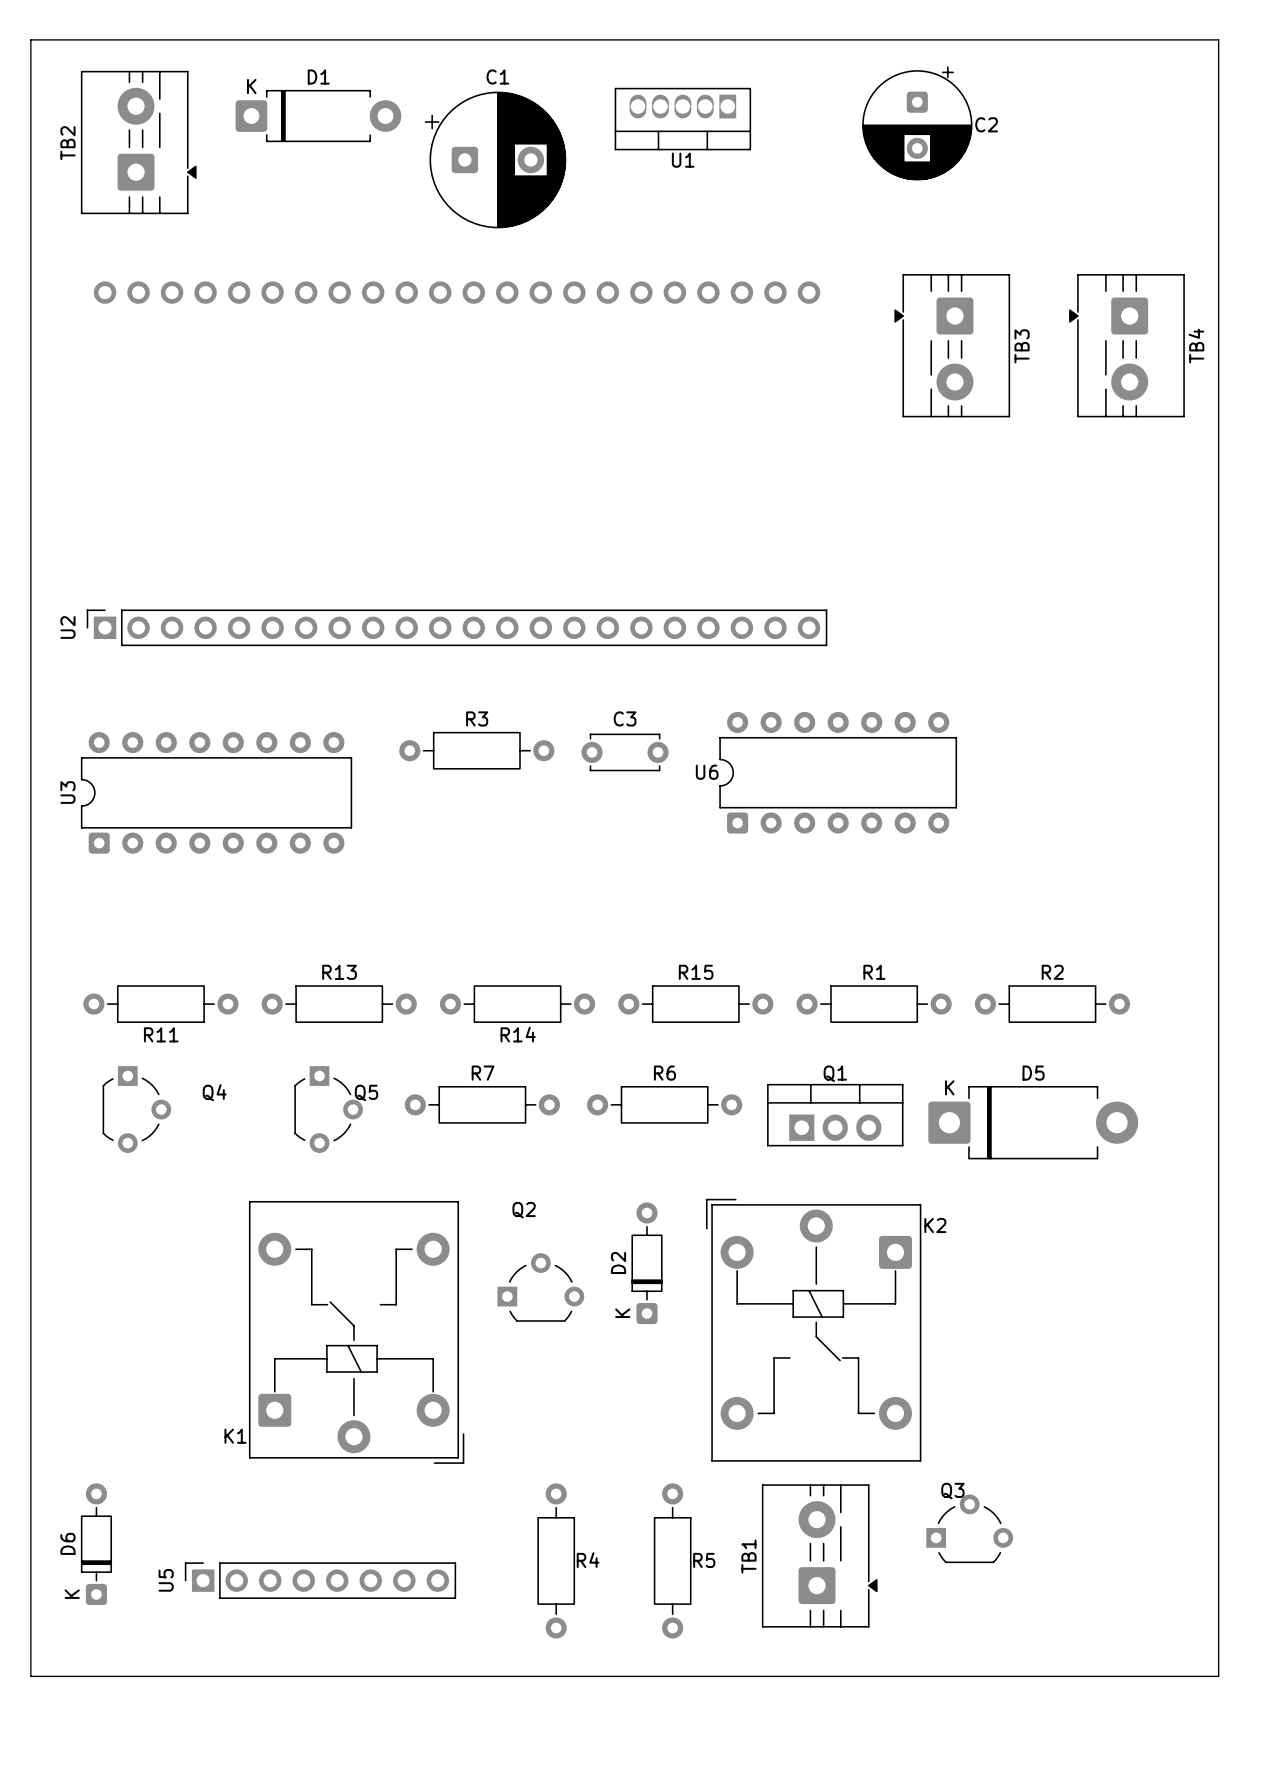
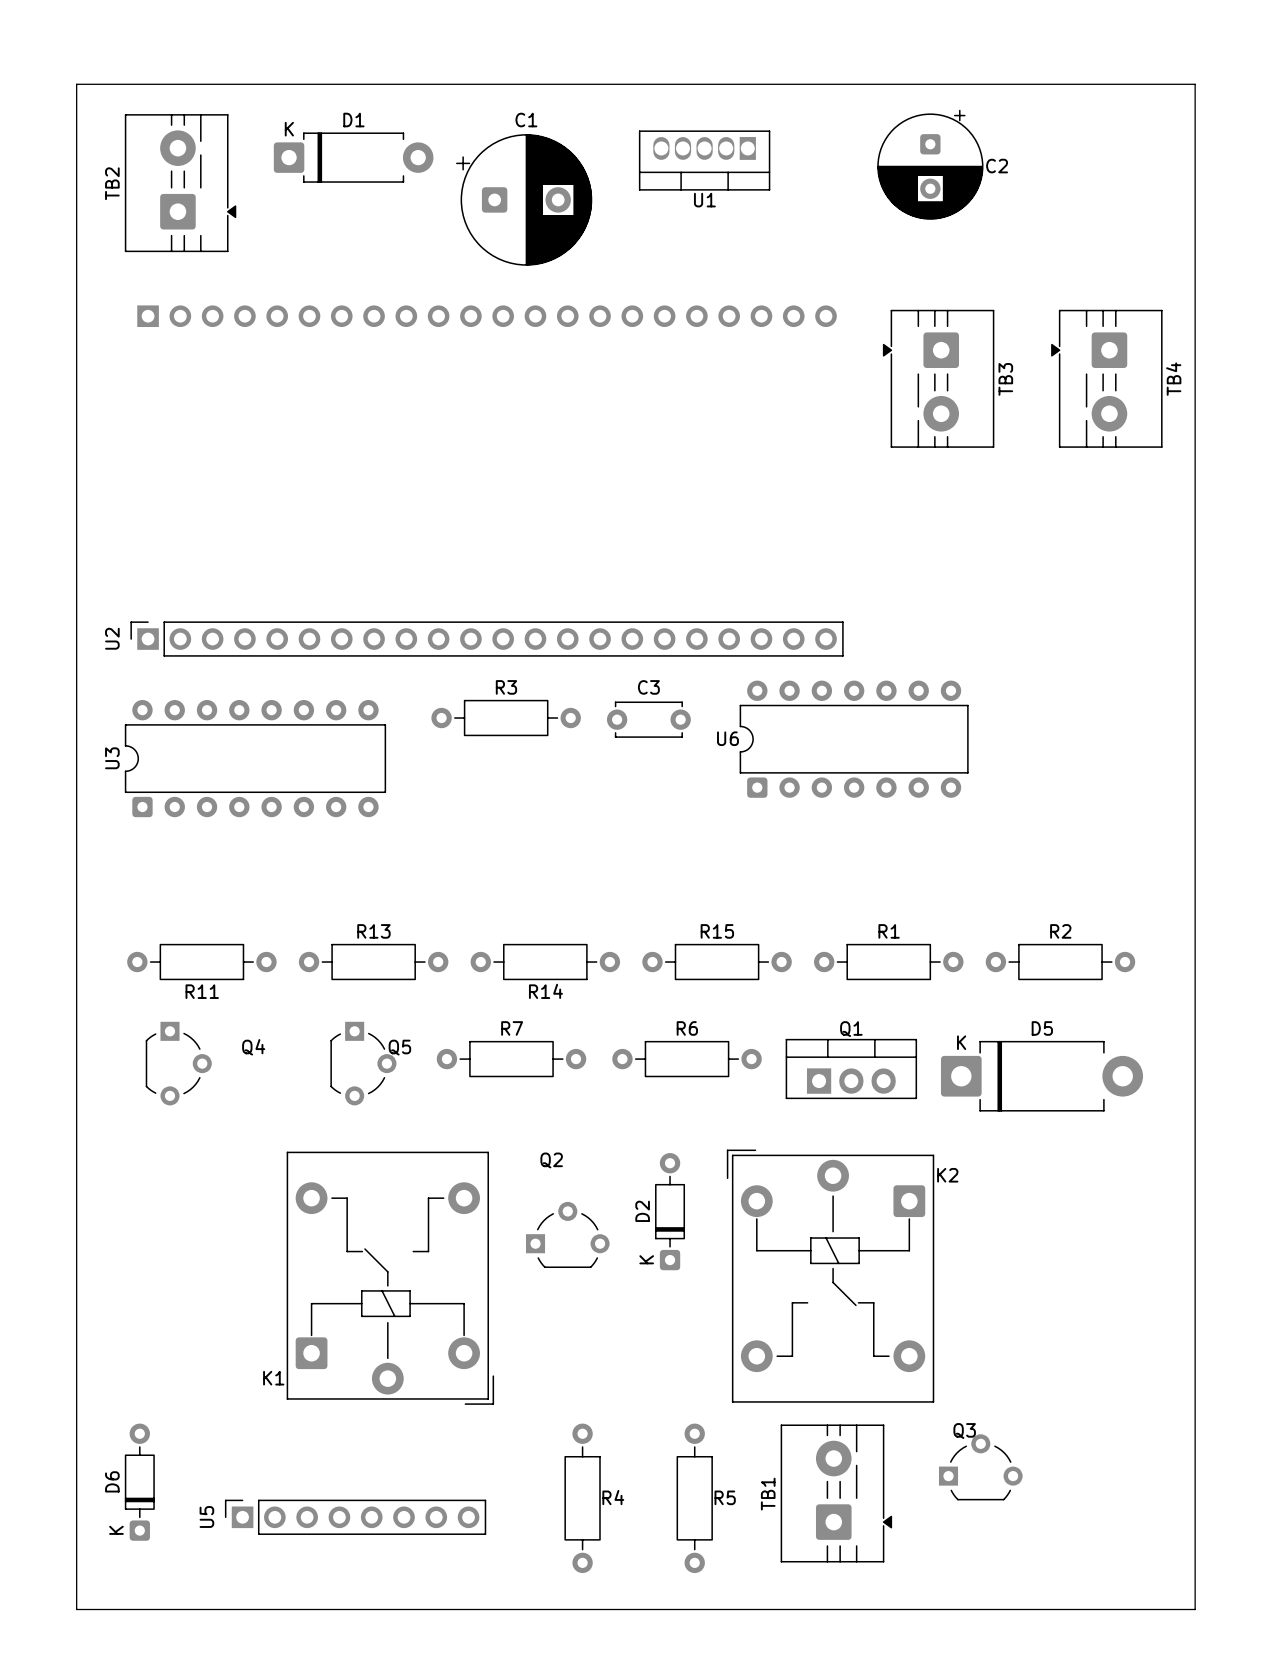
board edge: (30, 92) (30, 39) (1218, 39) (1218, 1676) (1192, 1676) -> (76, 84) (1195, 84) (1195, 1609)
D1 position: (318, 116) -> (353, 157)
U1 position: (682, 119) -> (704, 160)
C2 position: (917, 123) -> (930, 164)
TB2 position: (138, 142) -> (180, 183)
C1 position: (495, 159) -> (524, 199)
U2 footprint: [86, 281, 828, 647] -> [130, 305, 844, 657]
TB3 position: (952, 345) -> (938, 378)
TB4 position: (1126, 345) -> (1106, 378)

